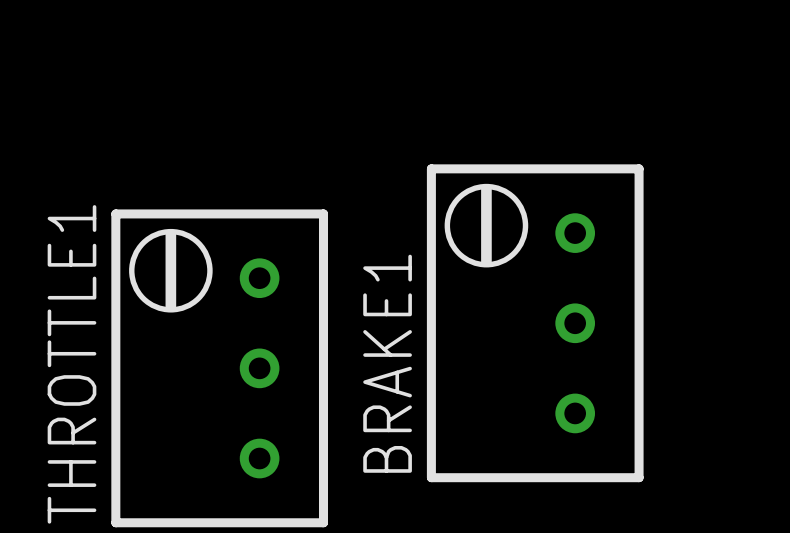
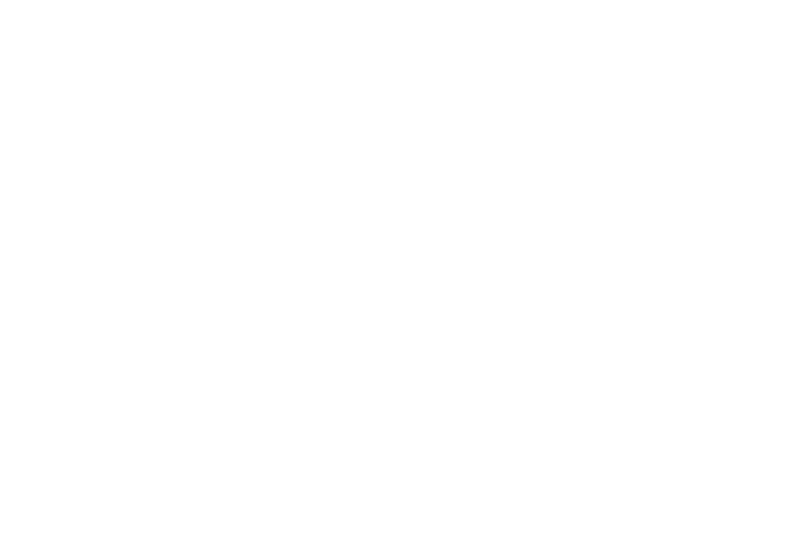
BRAKE1: (535, 323) -> none
THROTTLE1: (219, 368) -> none

